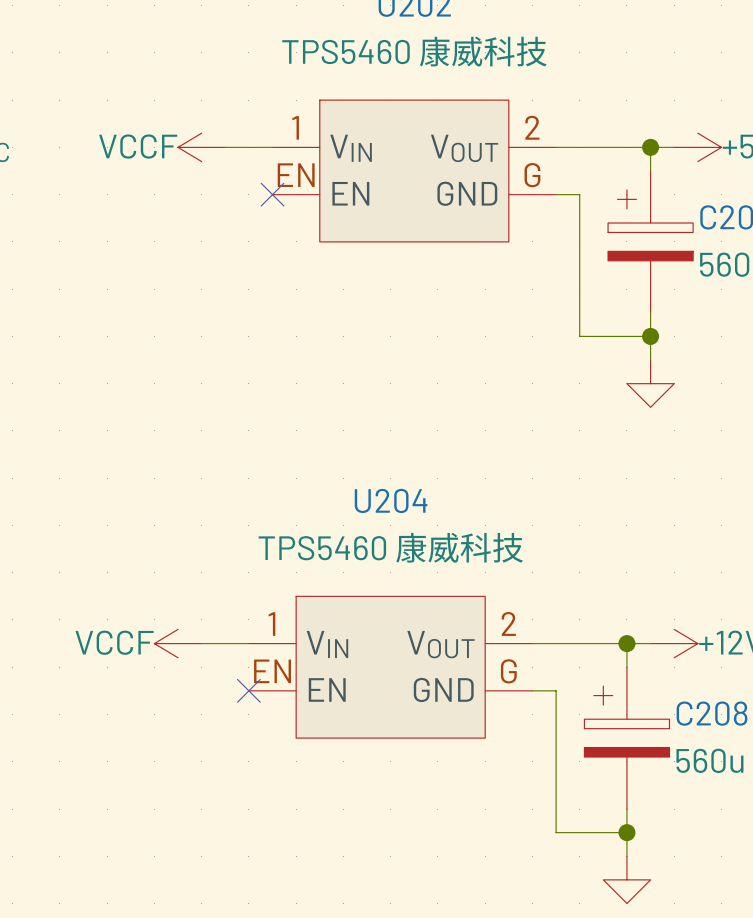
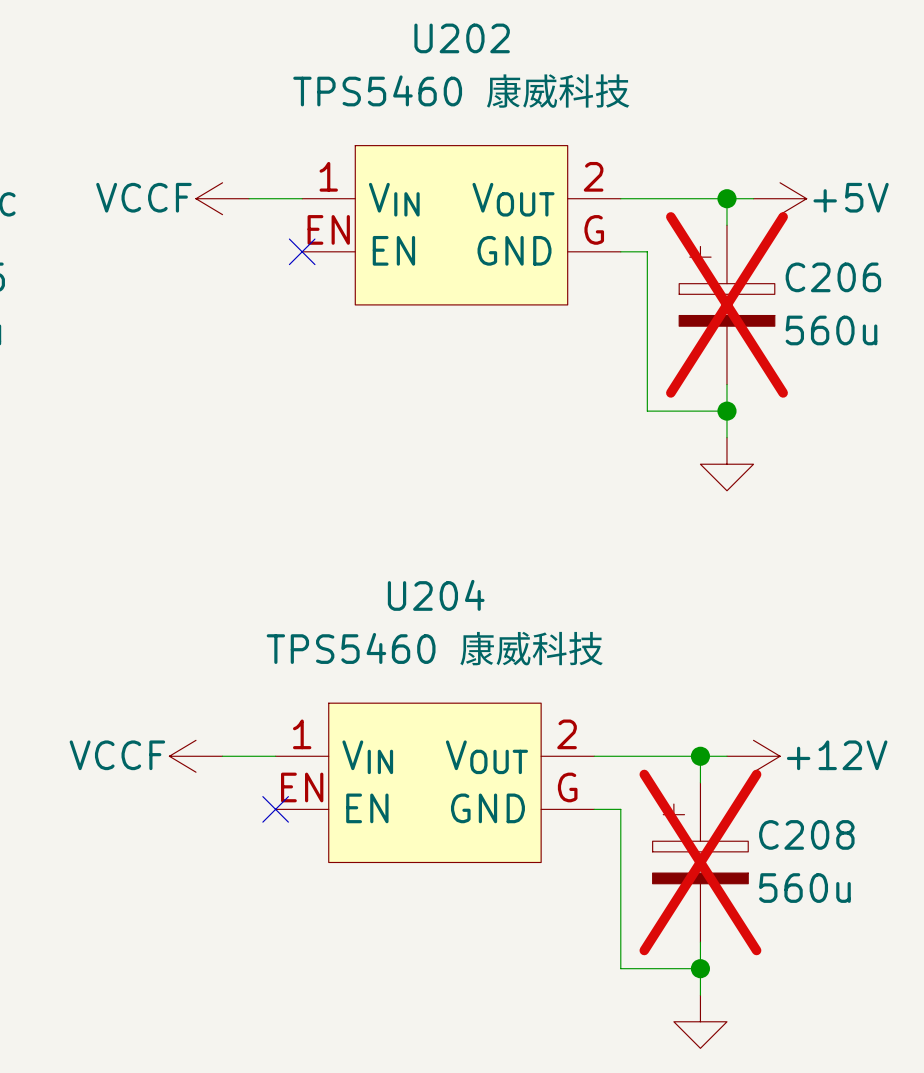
C206 do-not-place cross: none -> (726, 304)
C208 do-not-place cross: none -> (700, 862)

